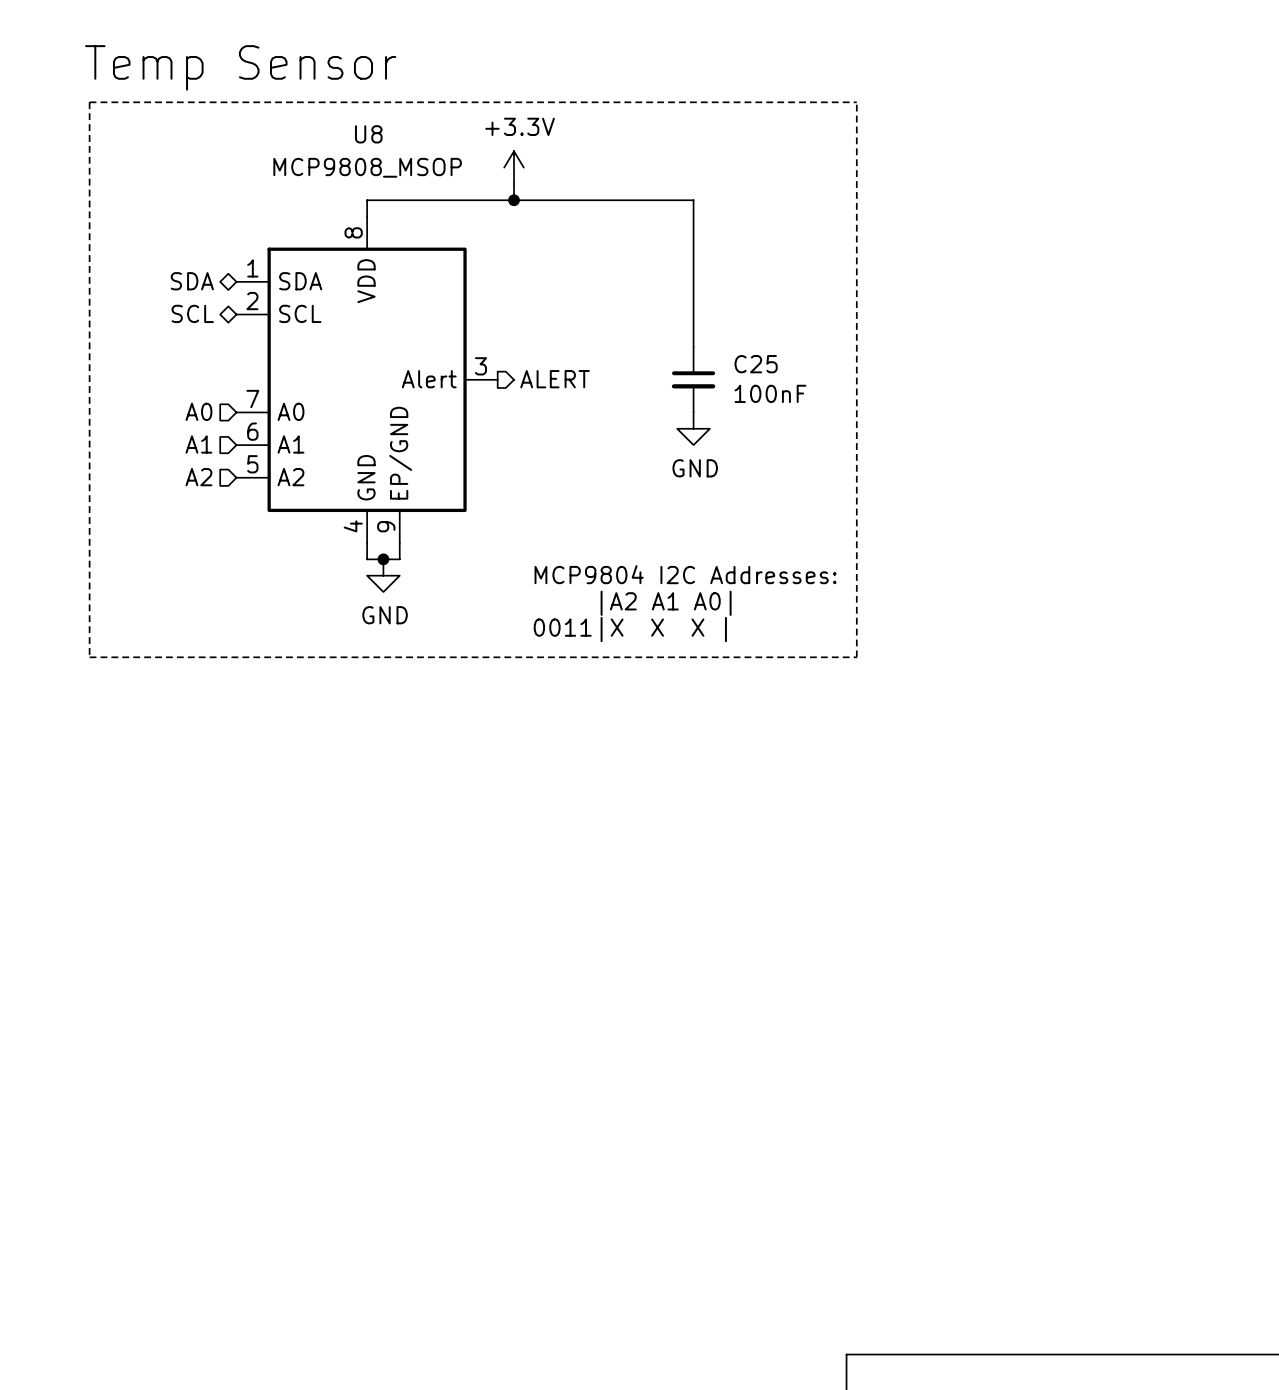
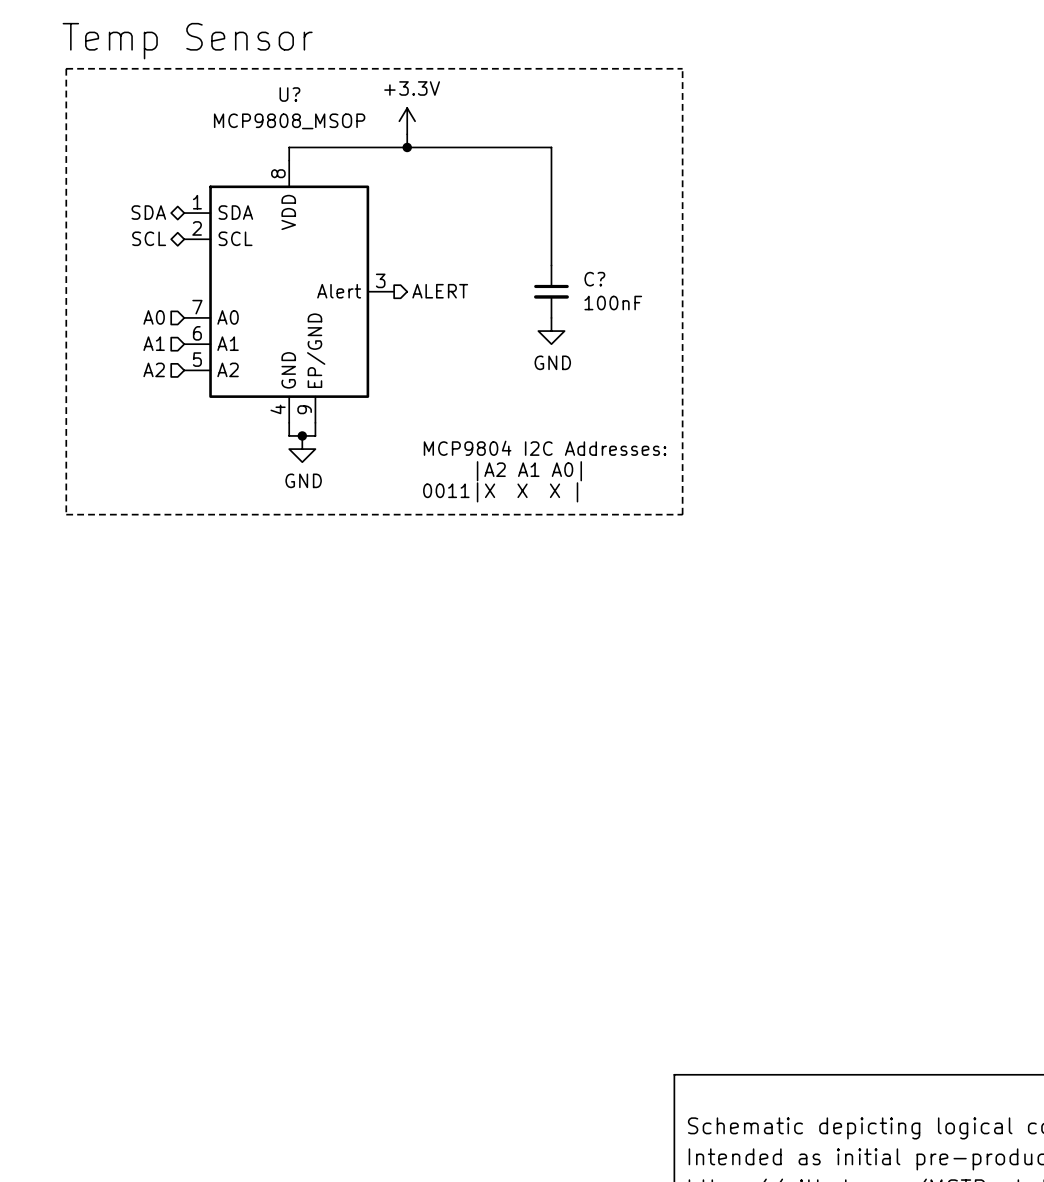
U8 name: U8 (368, 134) -> U? (289, 94)
C25 name: C25 (756, 364) -> C? (594, 279)

